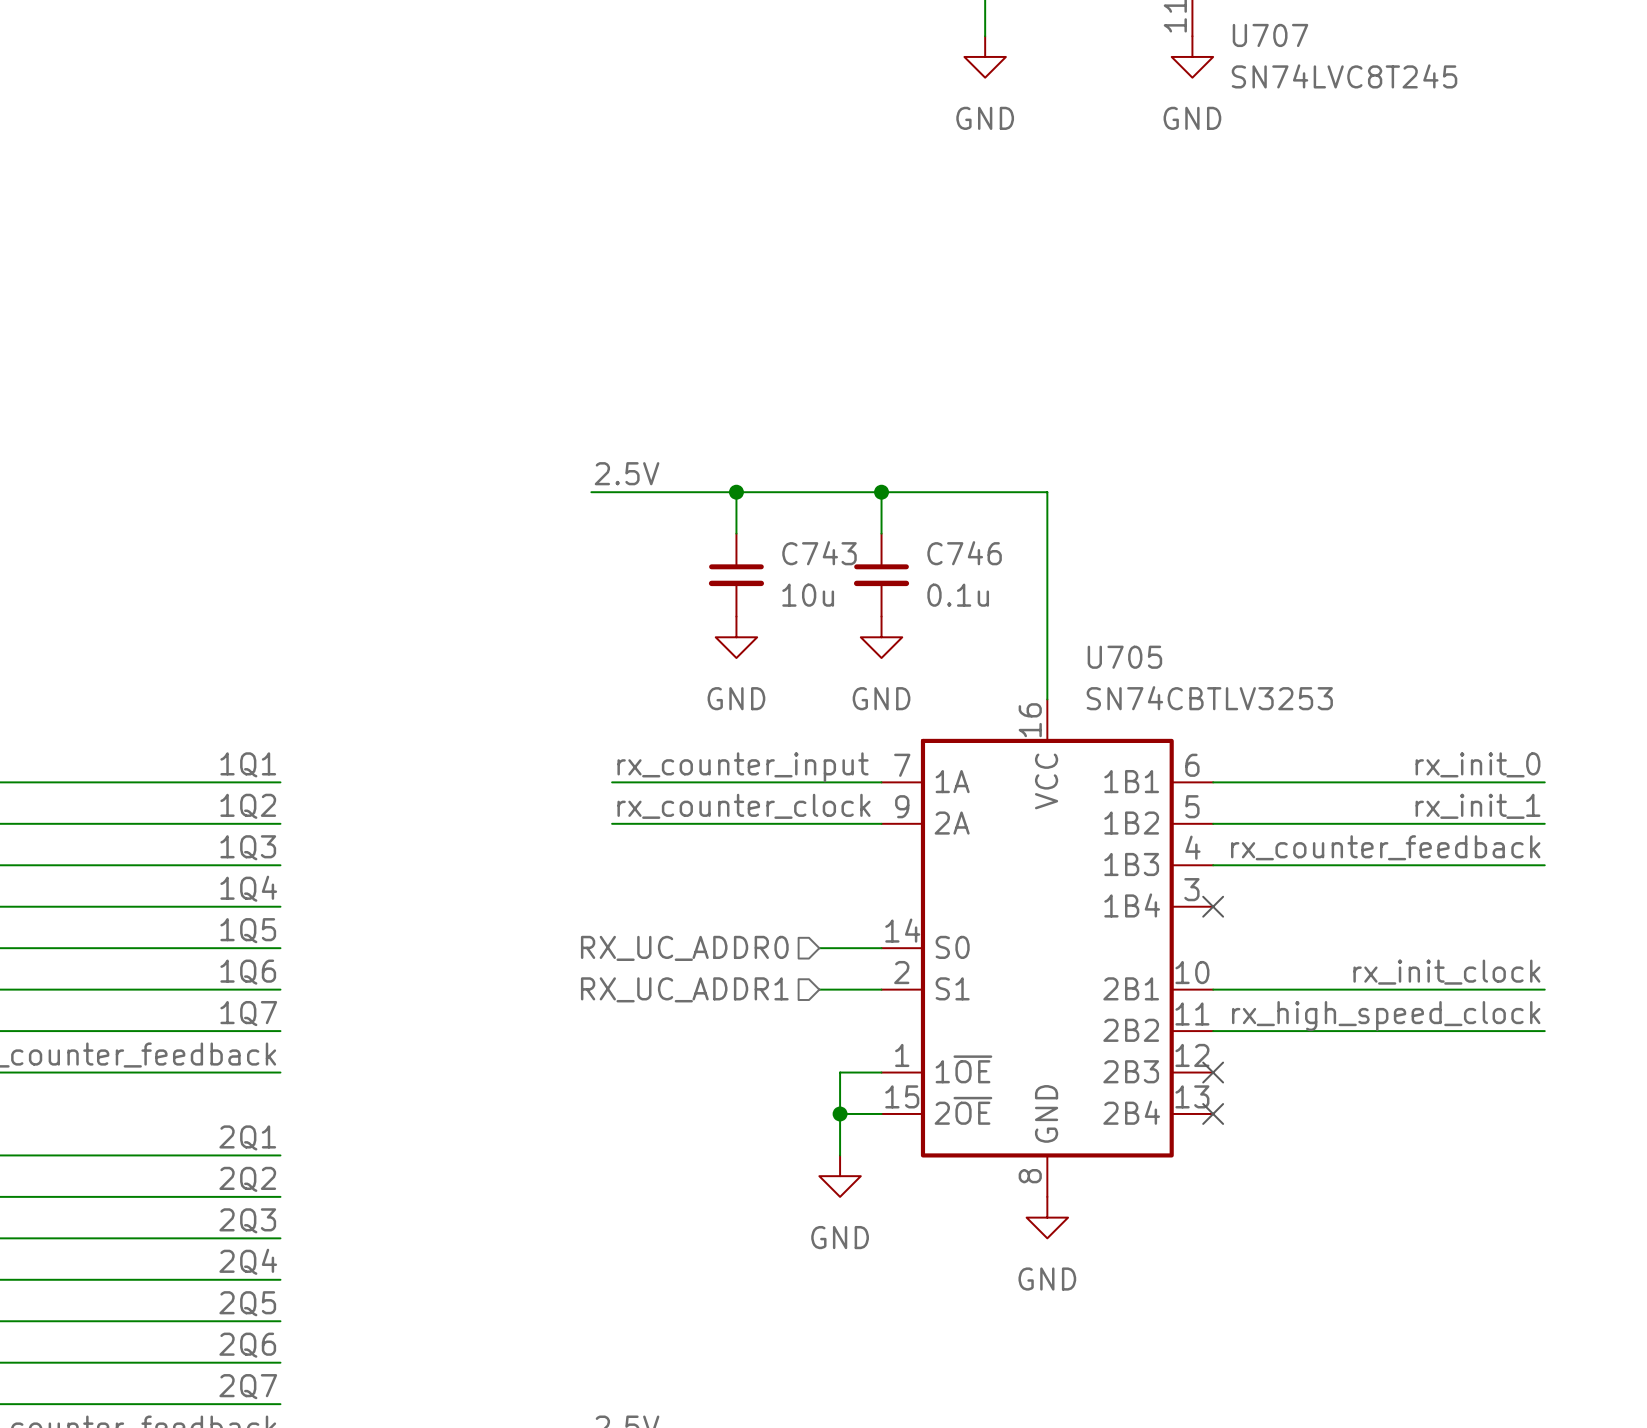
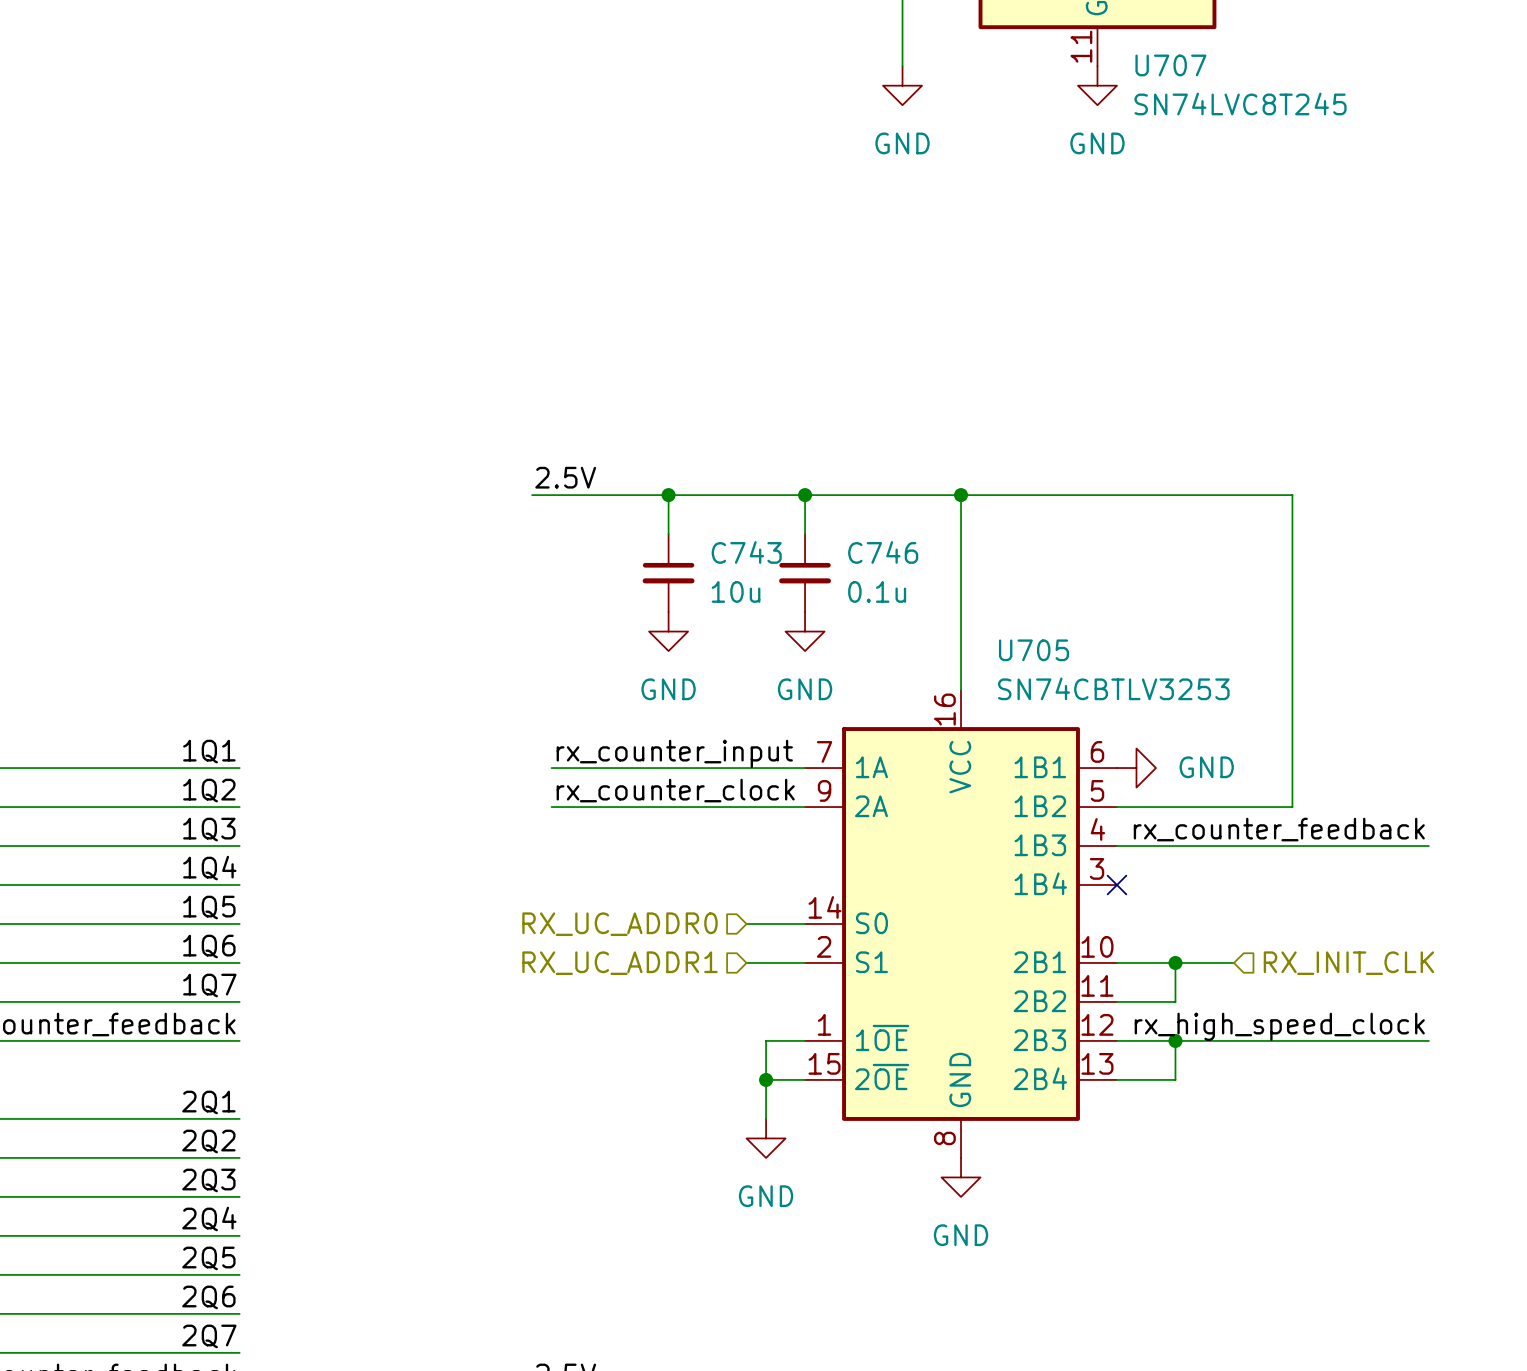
junction: none -> (961, 495)
label: rx_init_0 (1477, 764) -> none
wire: (1213, 782) (1544, 782) -> (1116, 1040) (1428, 1040)
power symbol: none -> GND (1136, 768)
label: rx_init_1 (1477, 806) -> none
wire: (1399, 823) (1544, 823) -> (1292, 807) (1292, 495) (961, 495)
label: rx_init_clock (1446, 972) -> none
junction: none -> (1175, 962)
wire: (1337, 989) (1544, 989) -> none
hierarchical label: none -> RX_INIT_CLK (1348, 963)
label position: rx_high_speed_clock (1386, 1016) -> rx_high_speed_clock (1279, 1026)
wire: (1275, 1031) (1544, 1031) -> (1175, 1001) (1175, 962)
no-connect mark: (1213, 1072) -> none
wire: none -> (1175, 1040) (1175, 1079) (1116, 1079)
junction: none -> (1175, 1040)
no-connect mark: (1213, 1113) -> none

